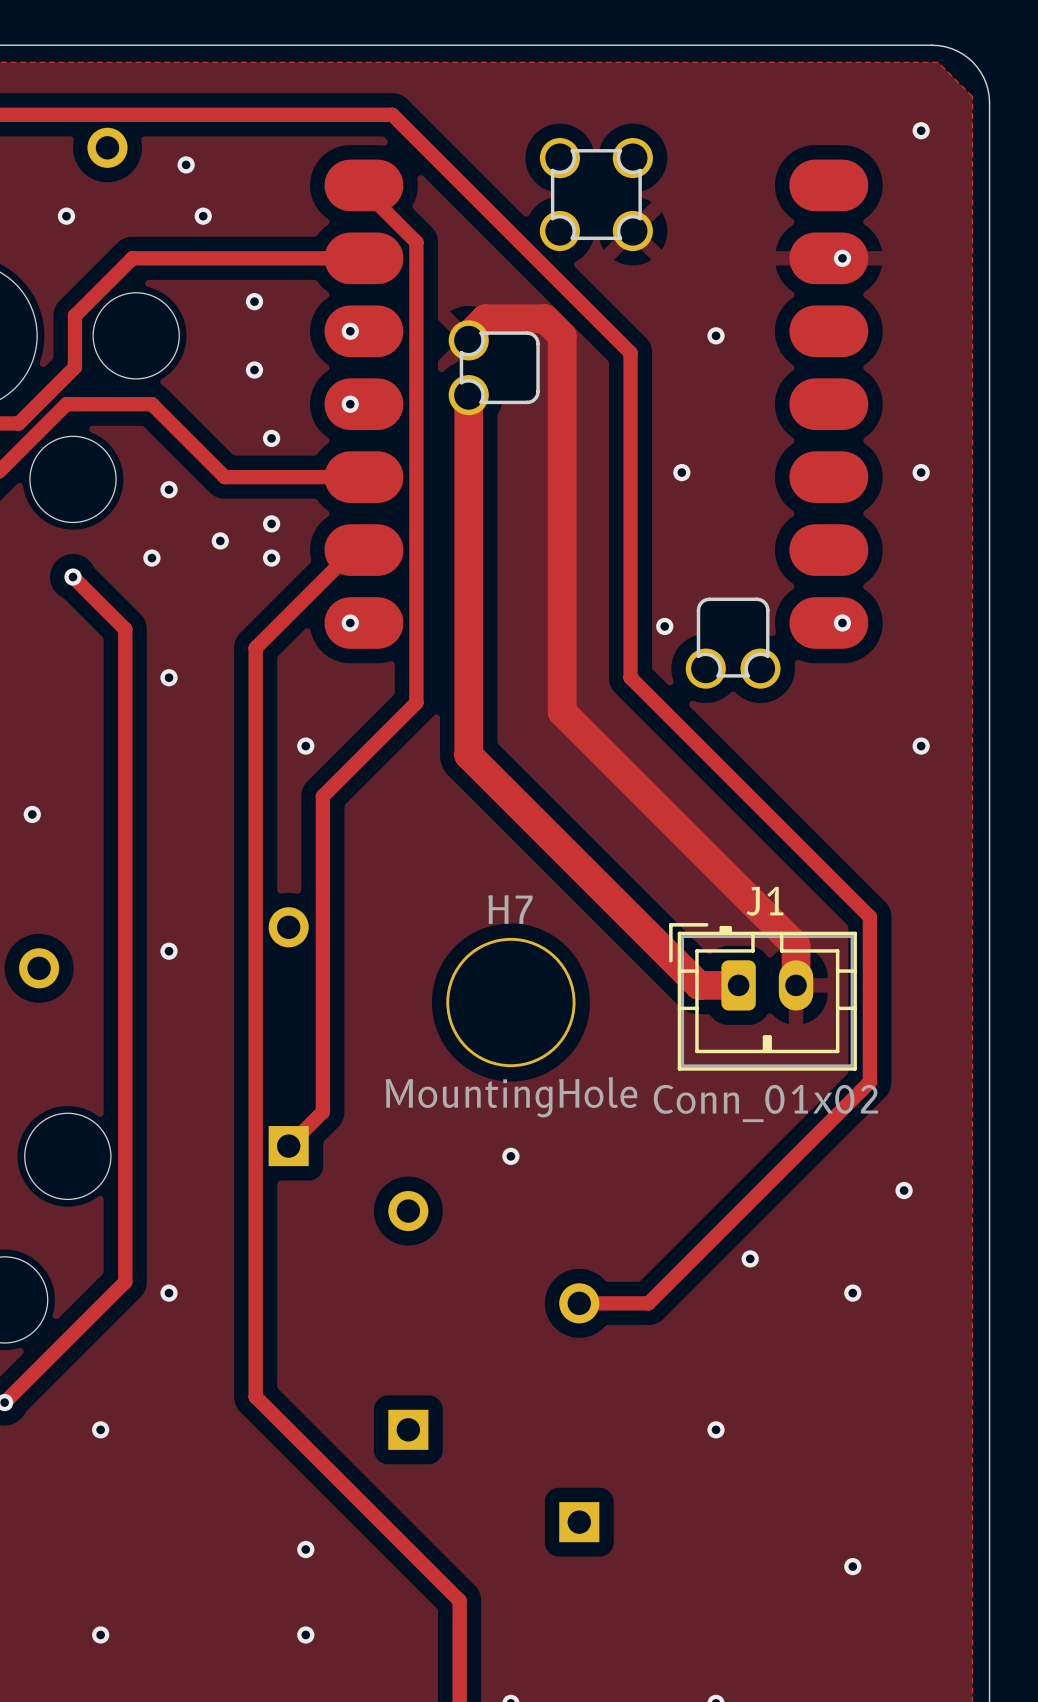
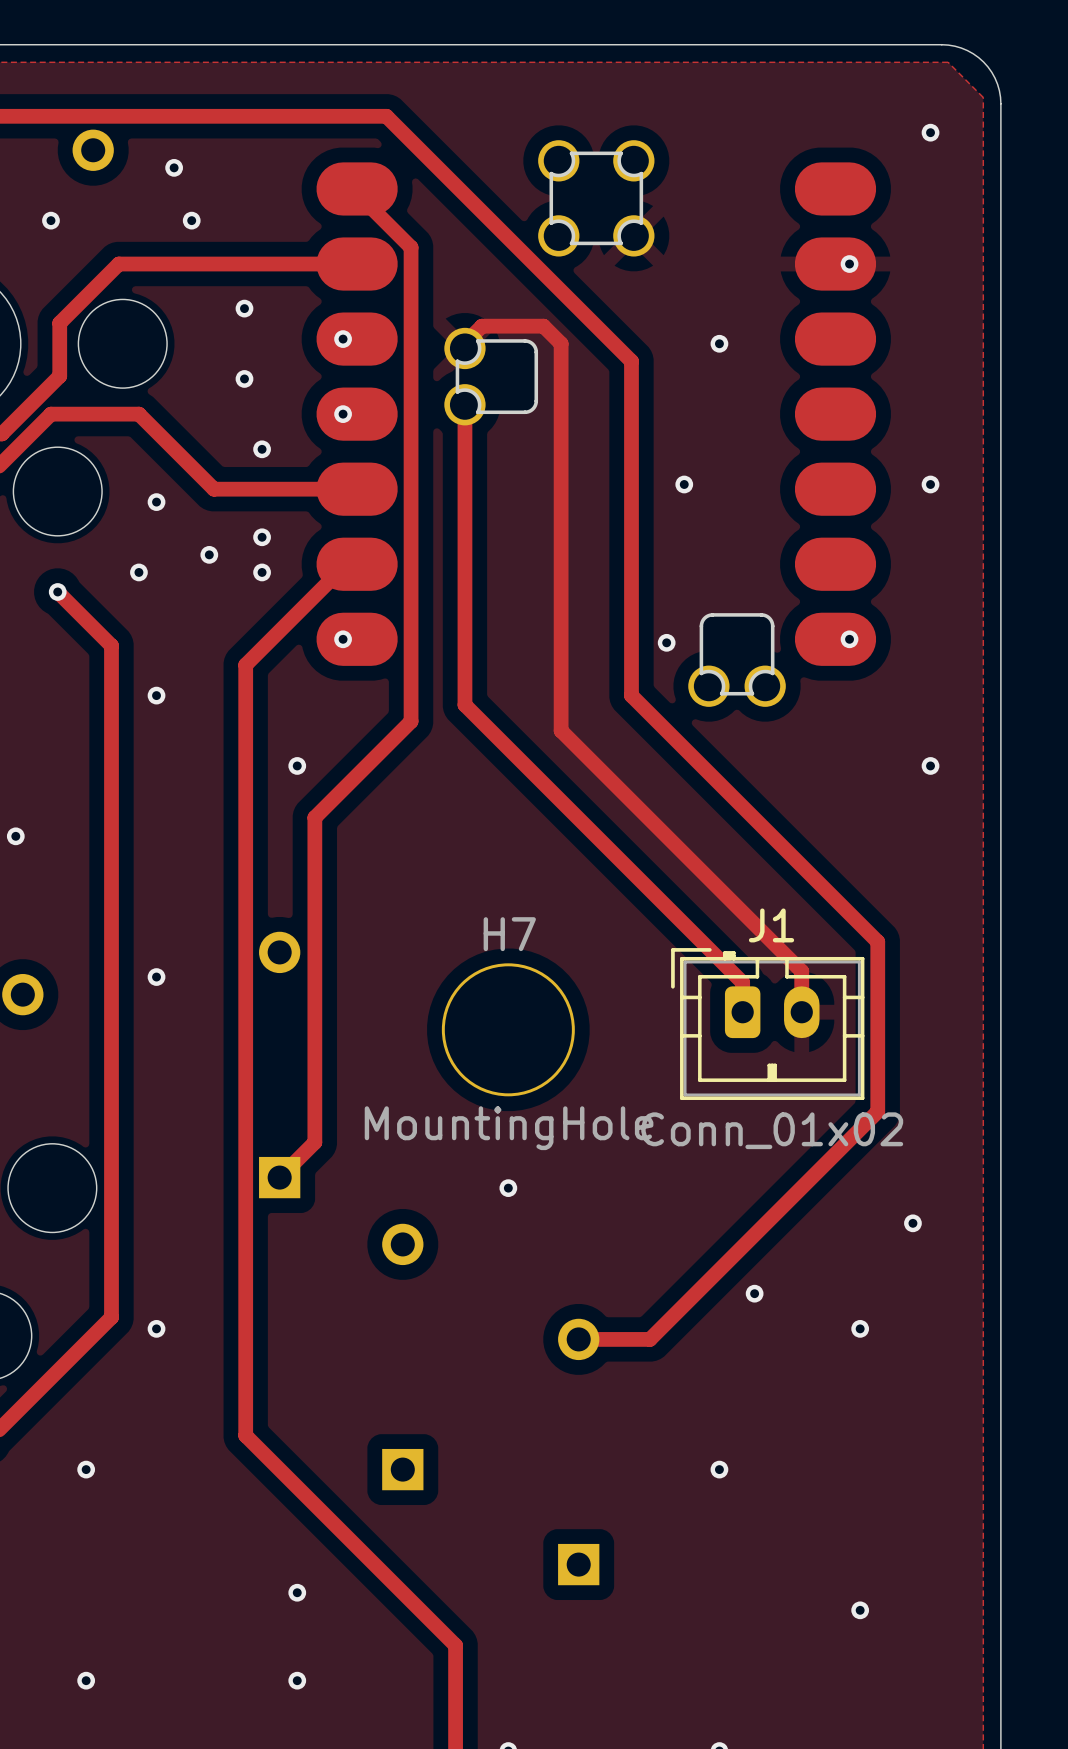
track width: thick (468, 335) (485, 318) (545, 318) (562, 335) (562, 711) (796, 945) (796, 985) -> thin (464, 343) (482, 326) (543, 326) (561, 343) (561, 730) (801, 971) (801, 1012)
track width: thick (468, 395) (468, 686) -> thin (464, 404) (464, 704)
track: (468, 686) (468, 755) (698, 985) (738, 985) -> (464, 704) (742, 982) (742, 1012)

